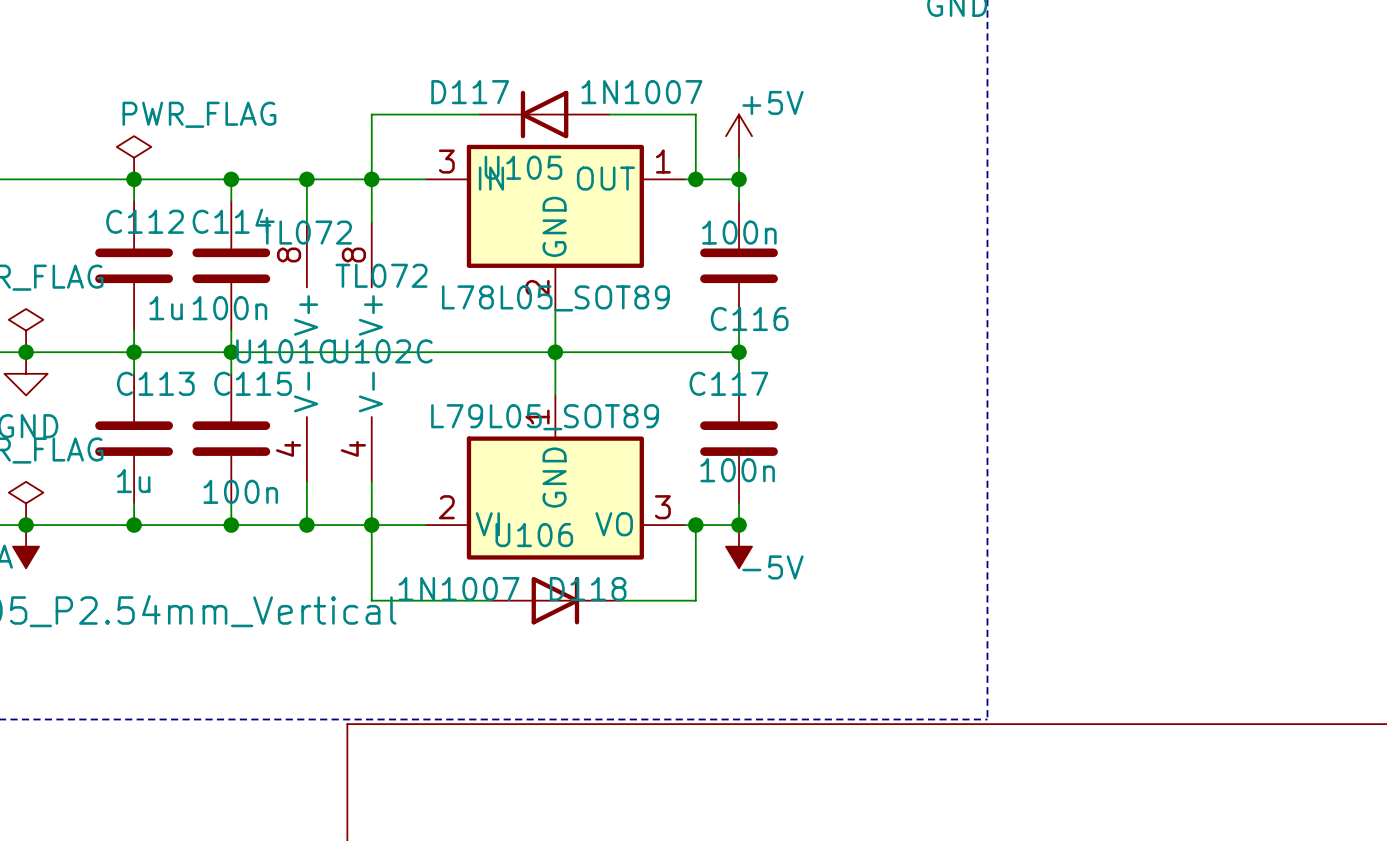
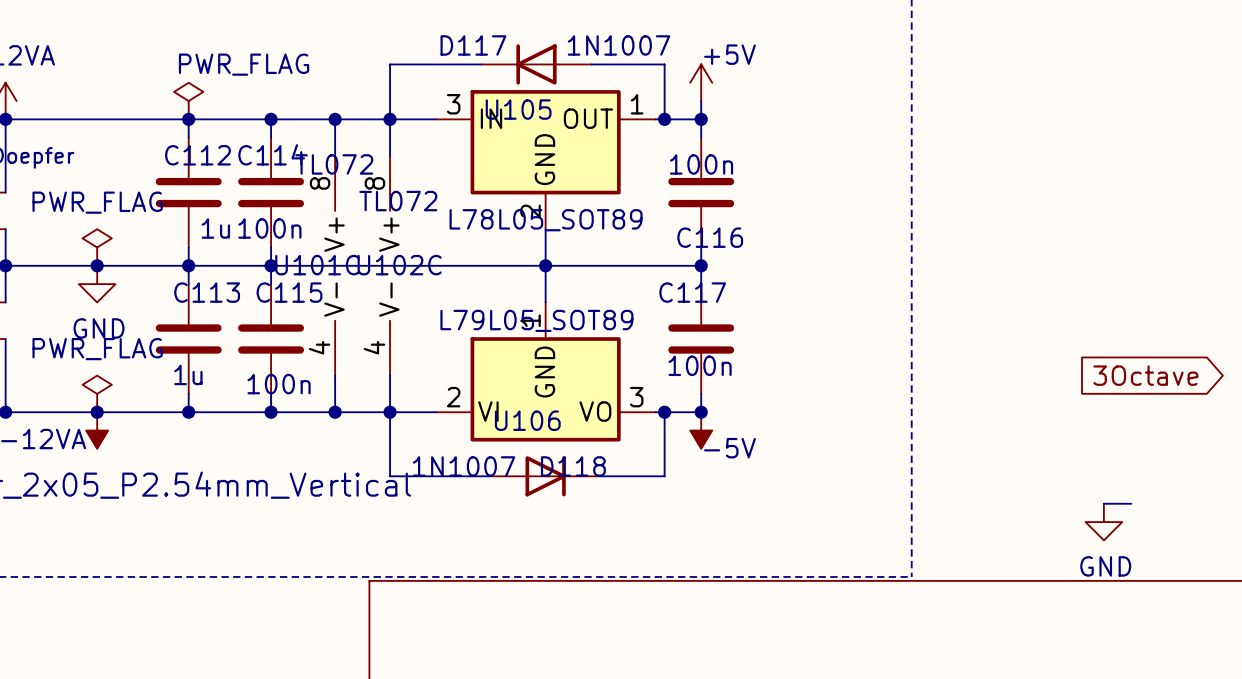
global label: none -> 3Octave (1145, 375)
wire: none -> (1103, 503) (1131, 503)
power symbol: none -> GND (1103, 522)

